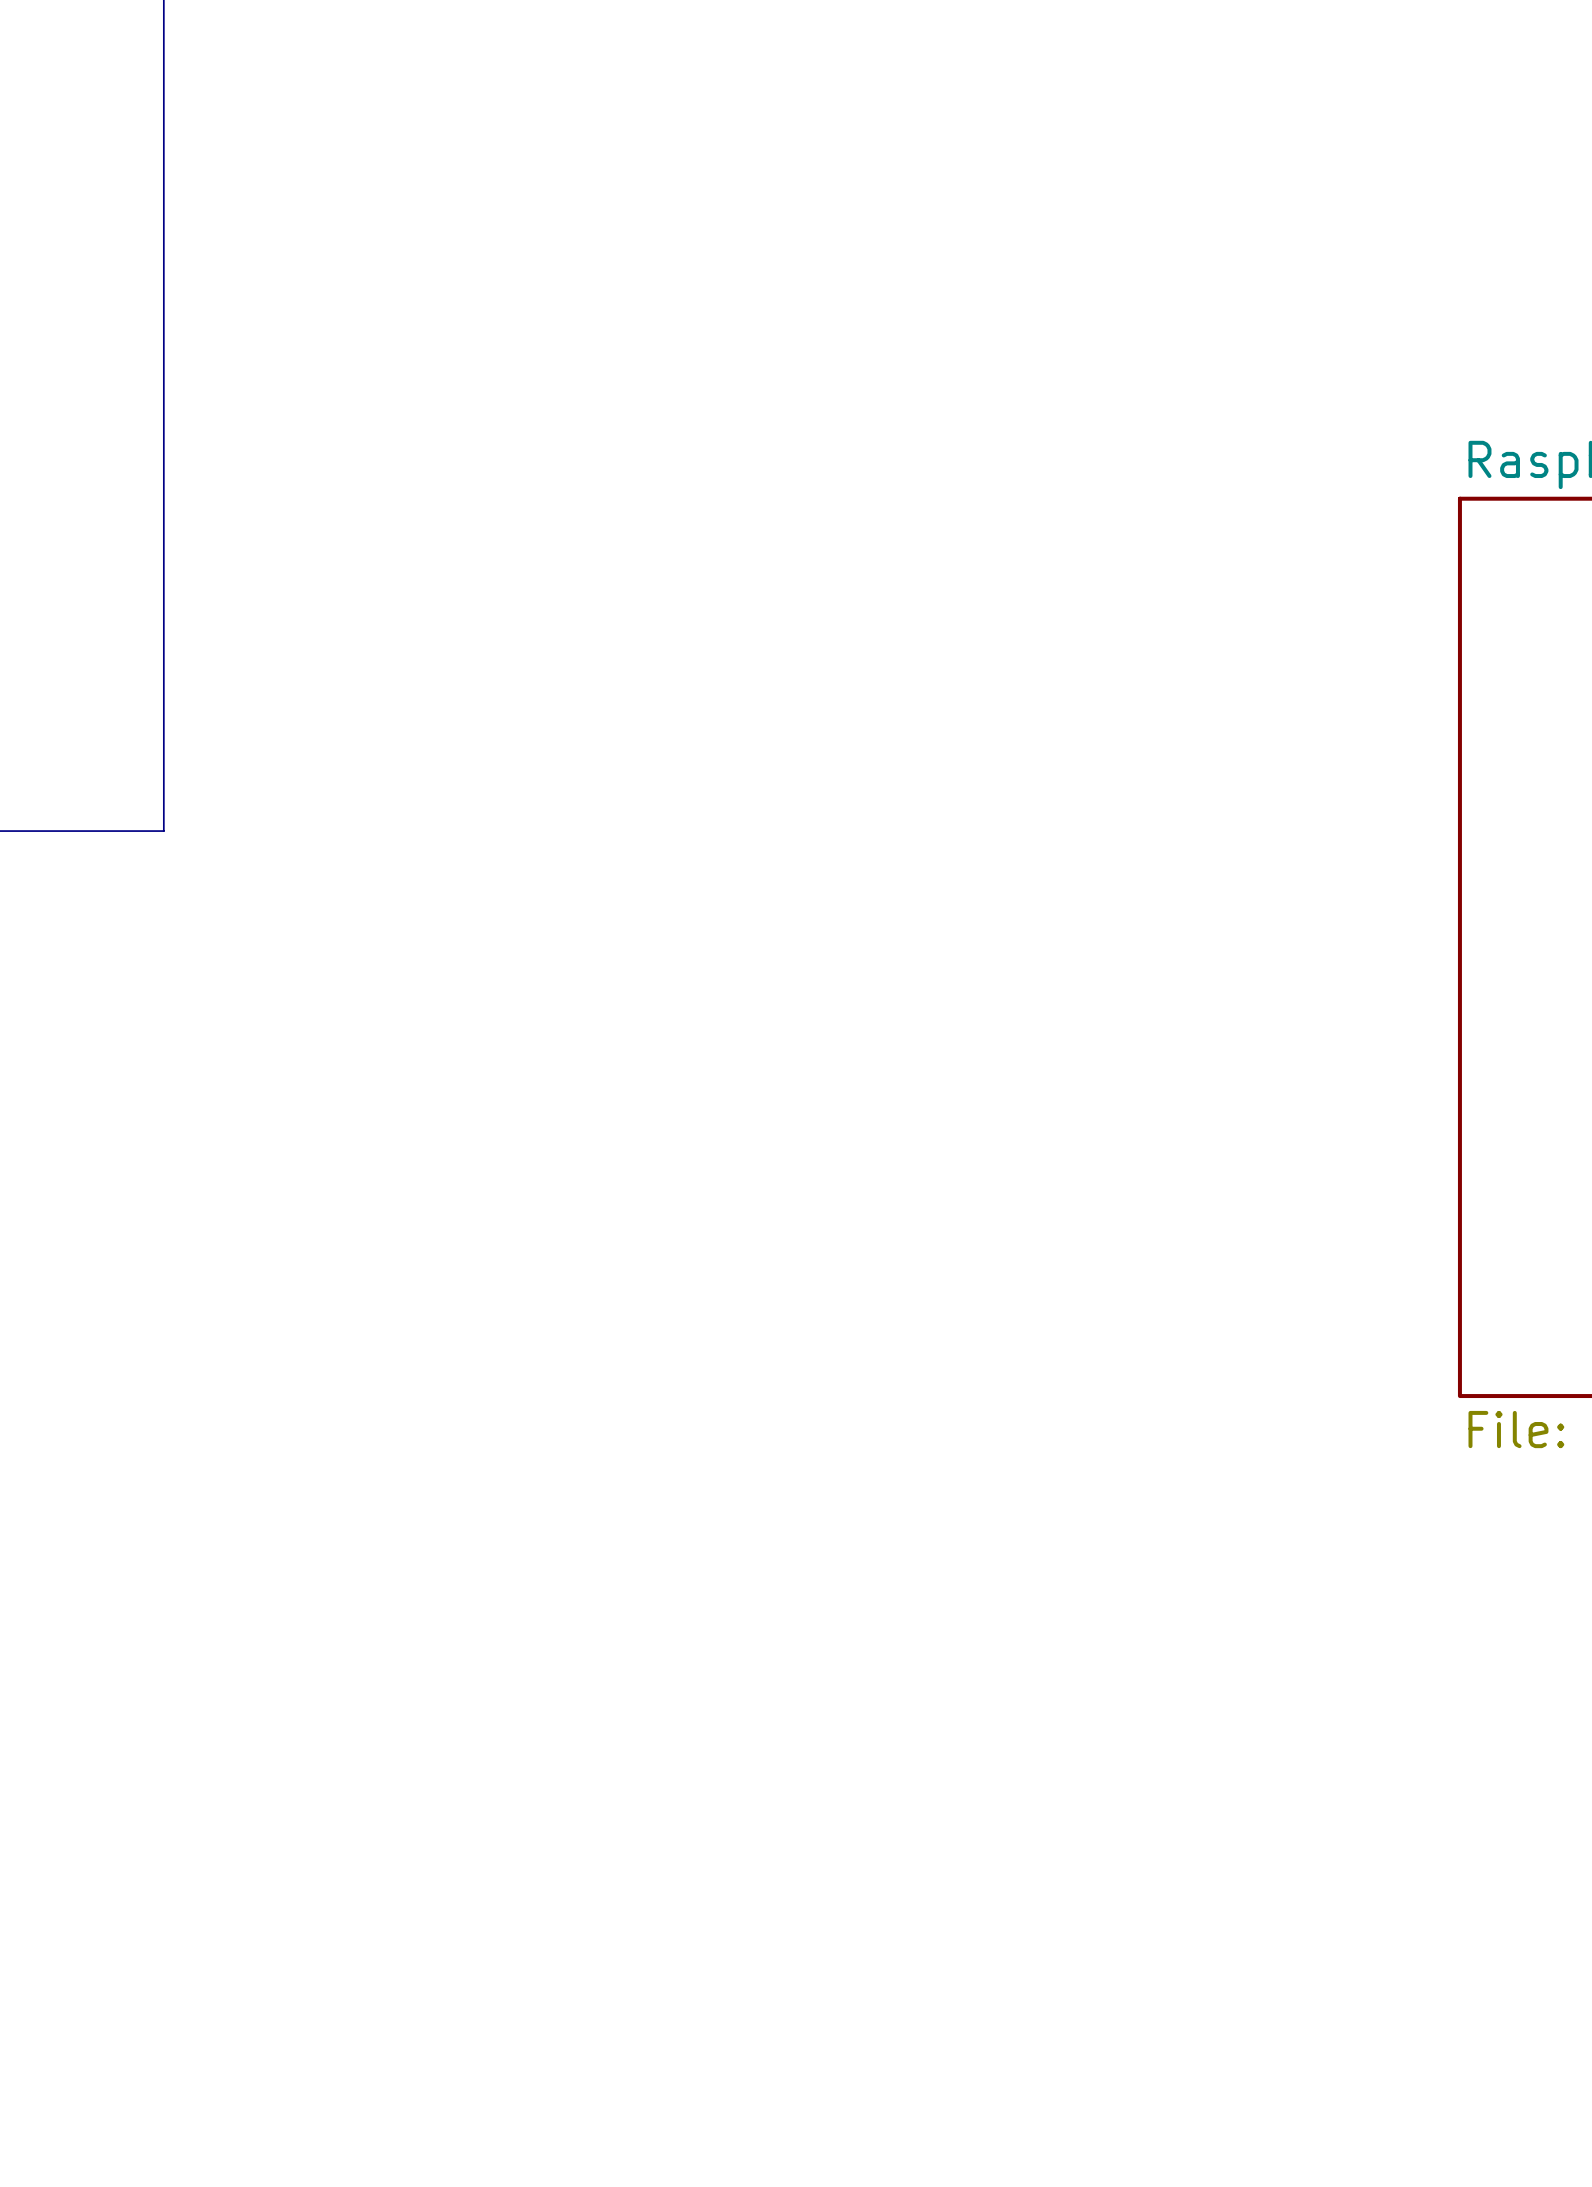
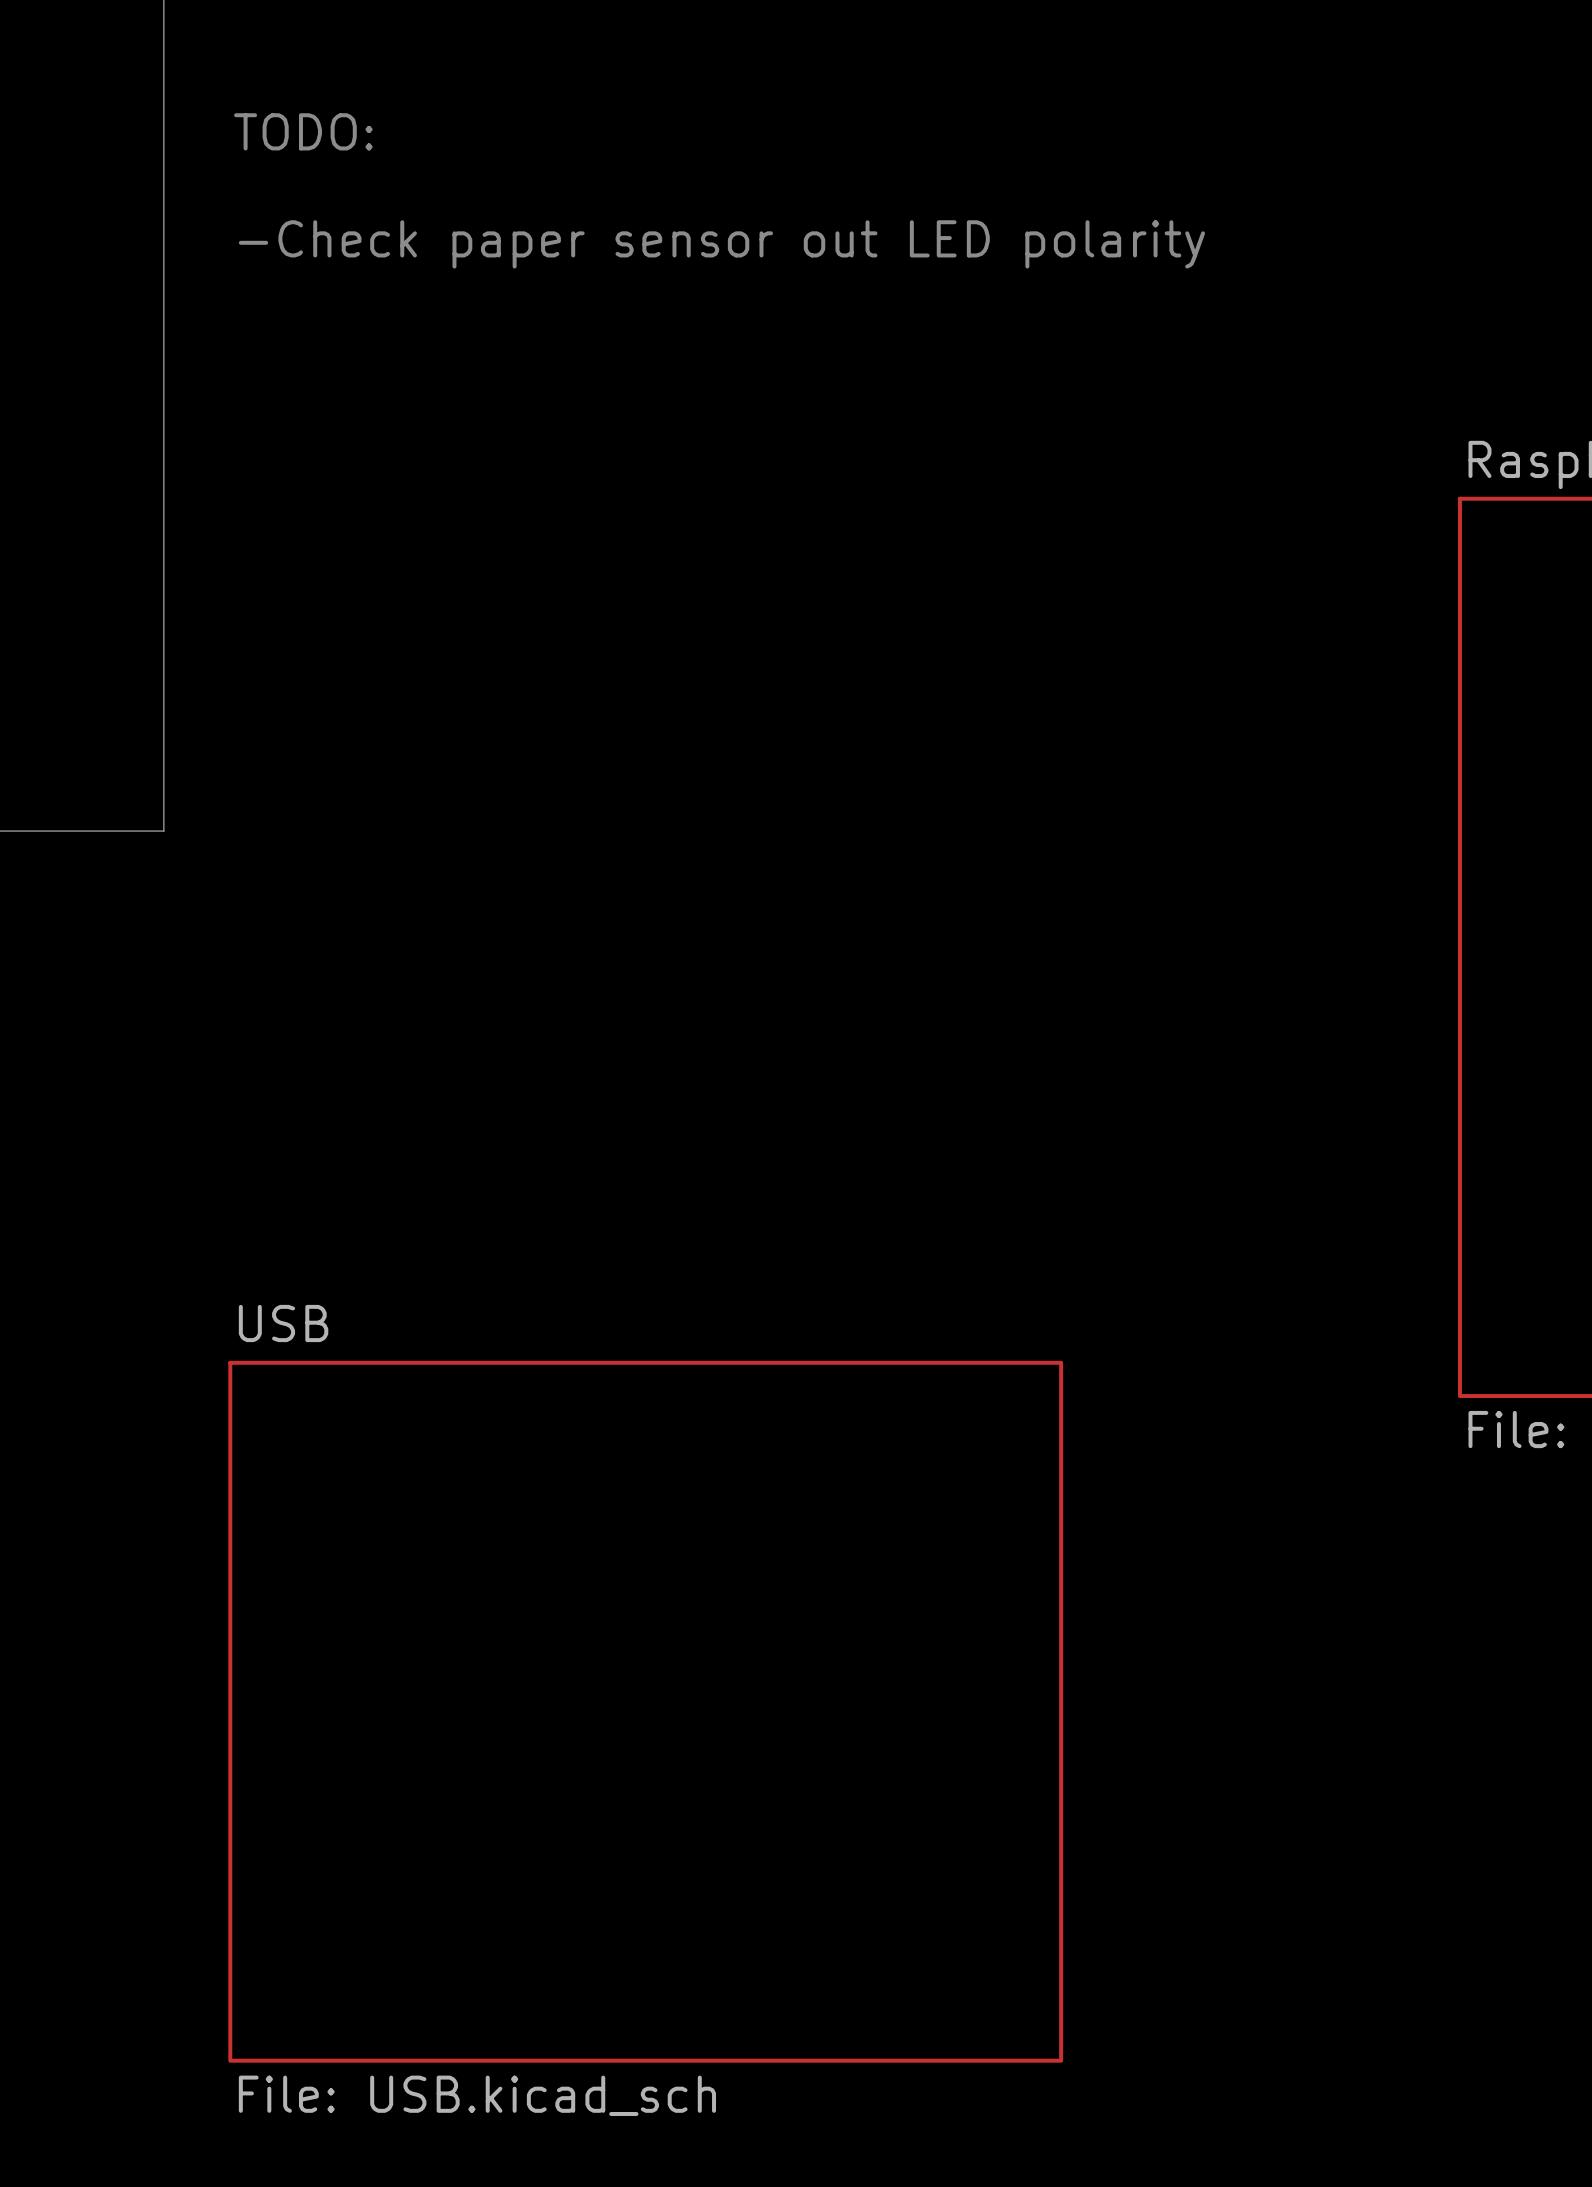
text: none -> TODO: (303, 131)
text: none -> -Check paper sensor out LED polarity (721, 244)
sheet USB: none -> File: USB.kicad_sch (645, 1711)

